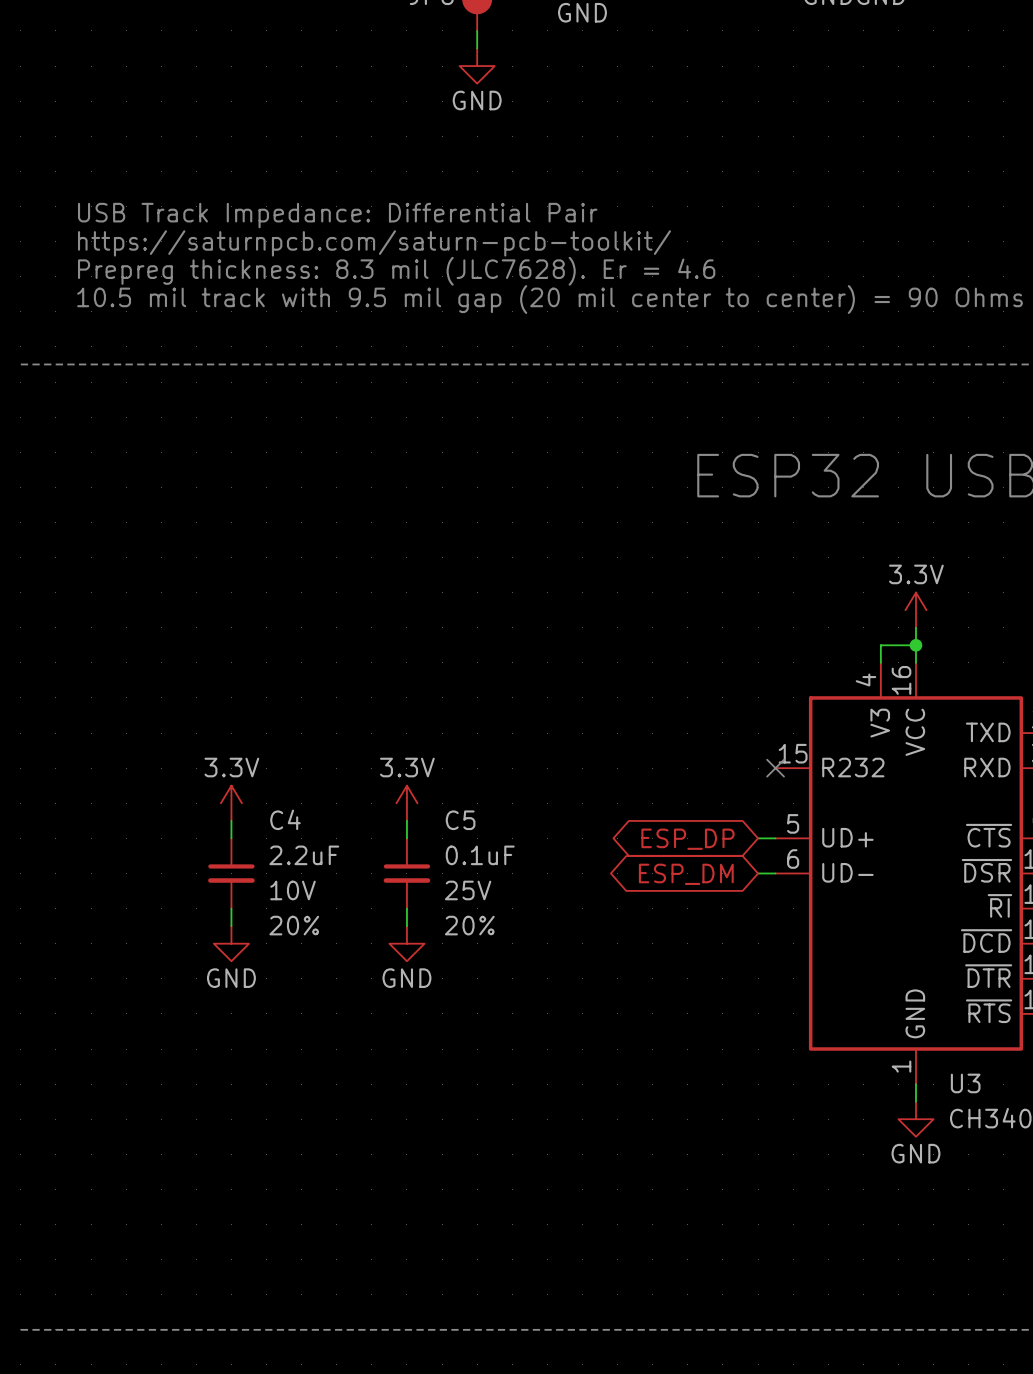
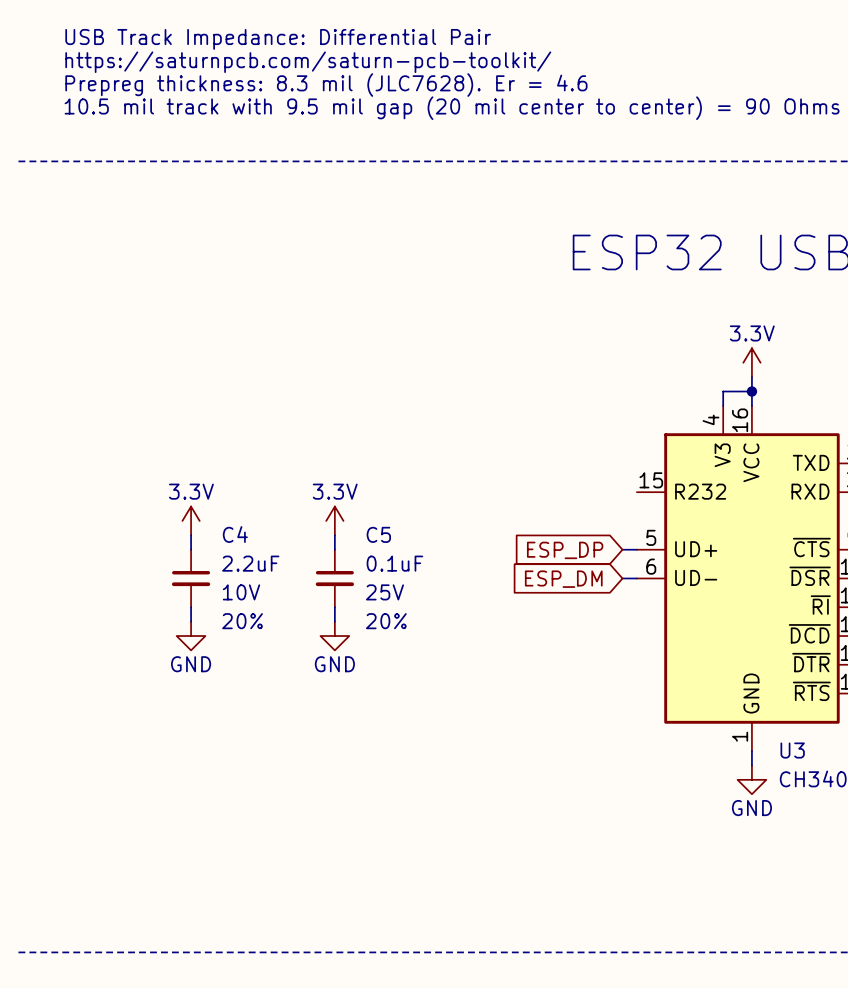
no-connect mark: (775, 768) -> none
global label shape: bidirectional (687, 839) -> input (565, 550)
global label shape: bidirectional (686, 874) -> input (563, 579)

